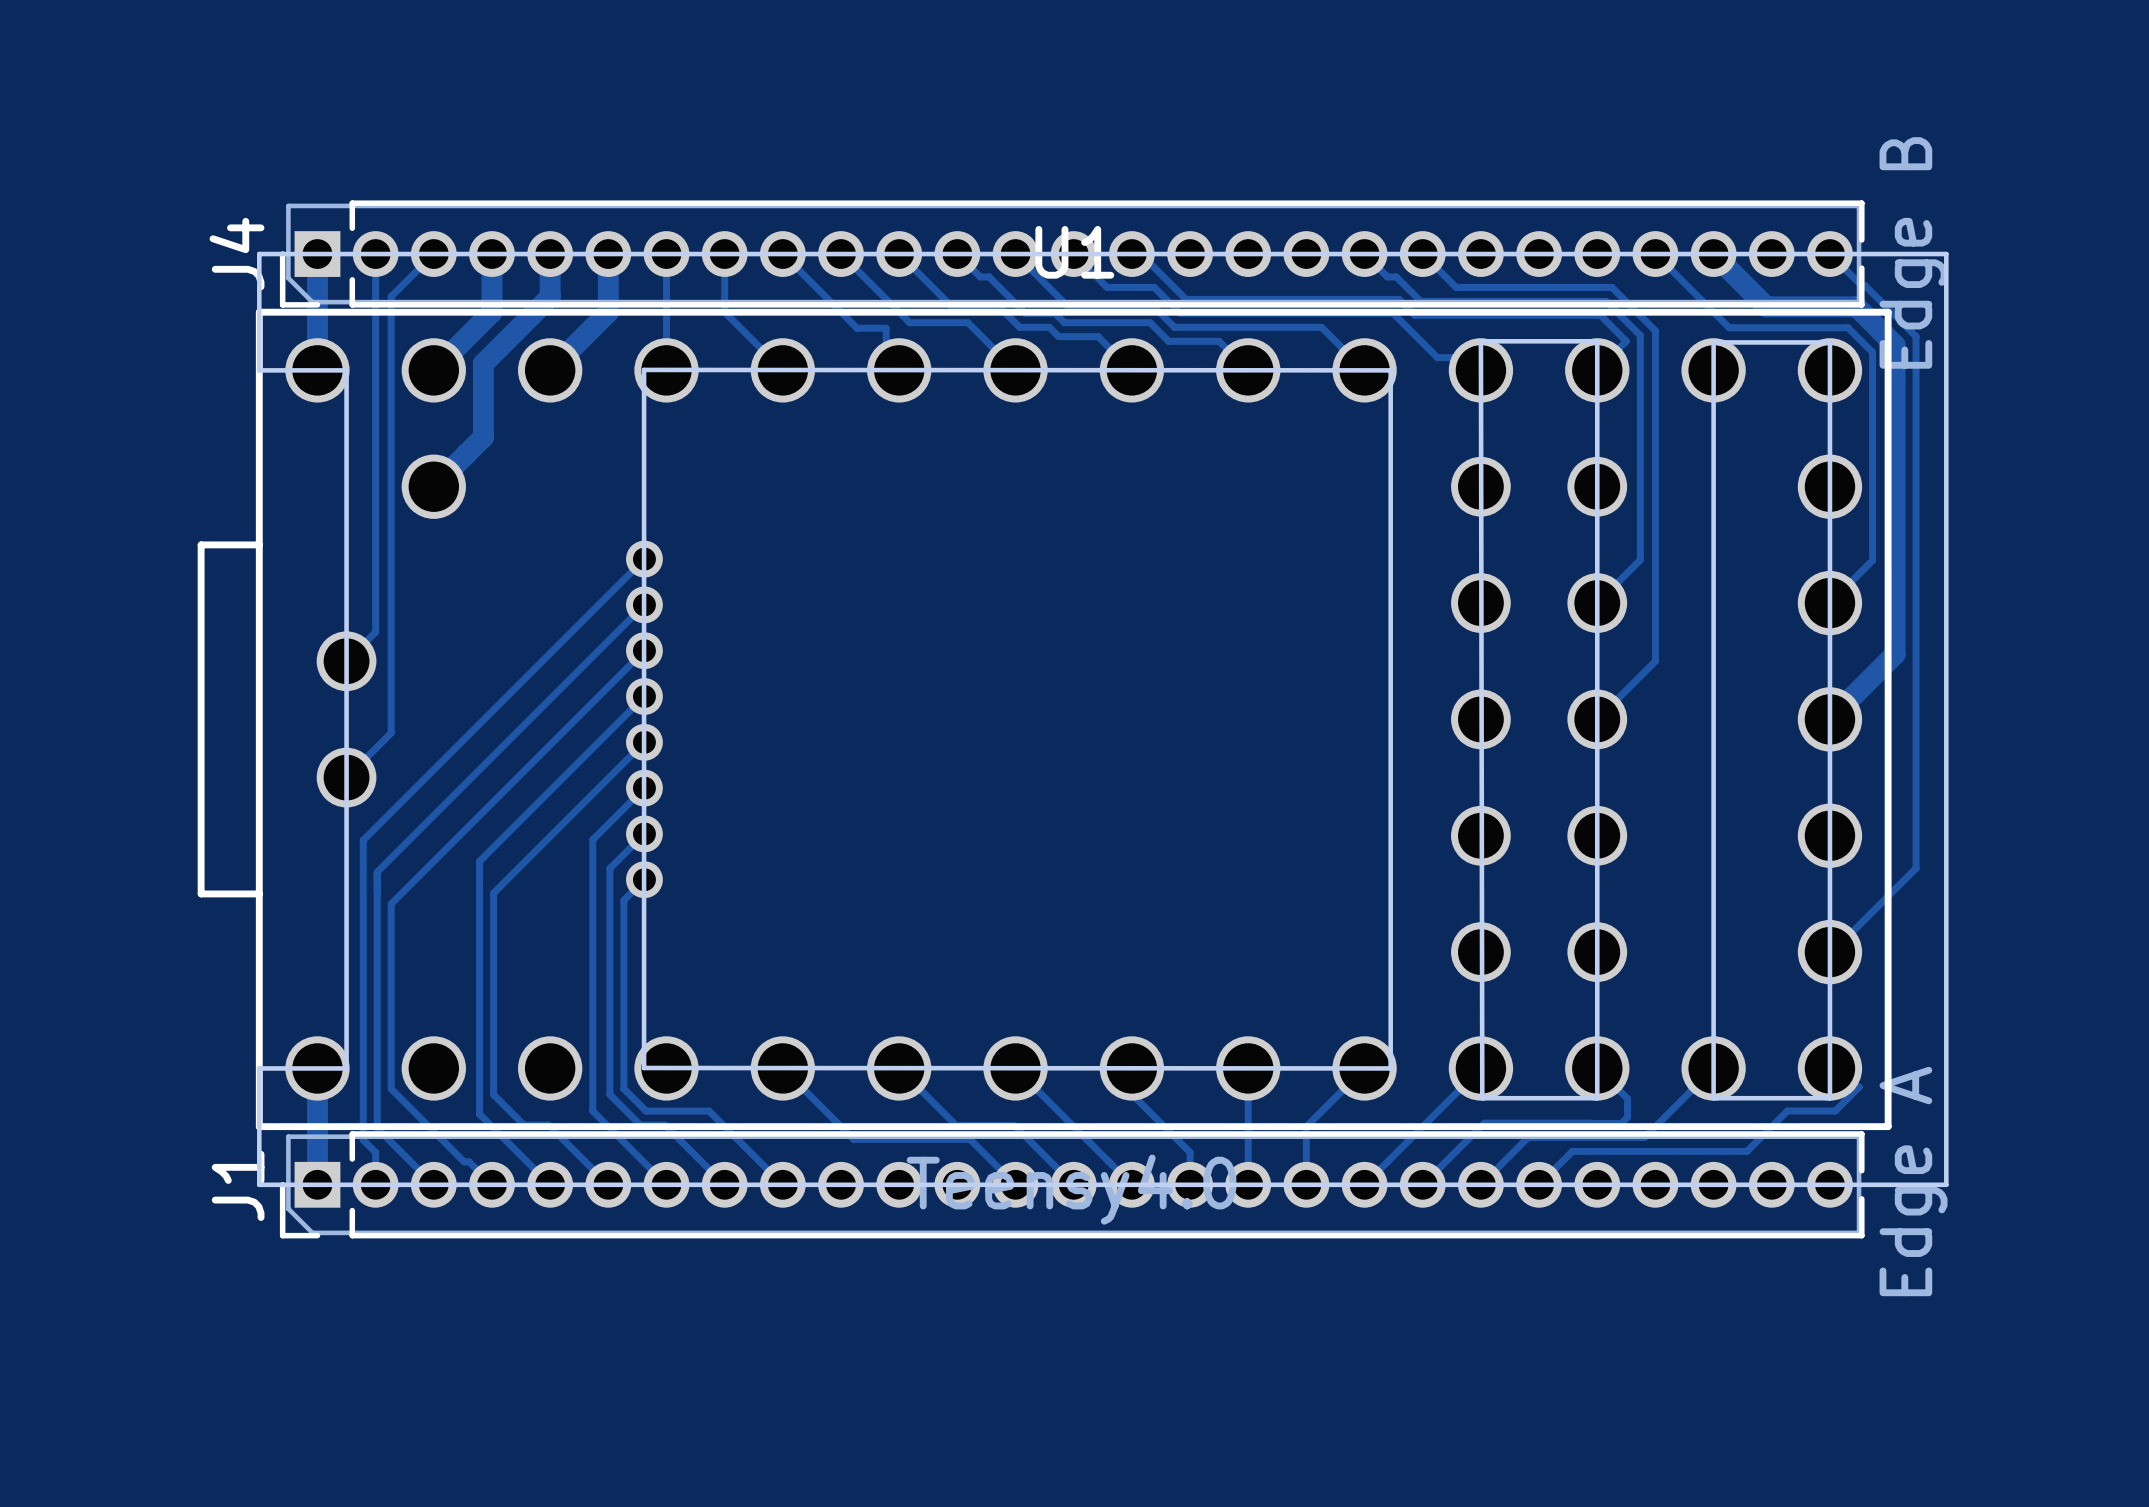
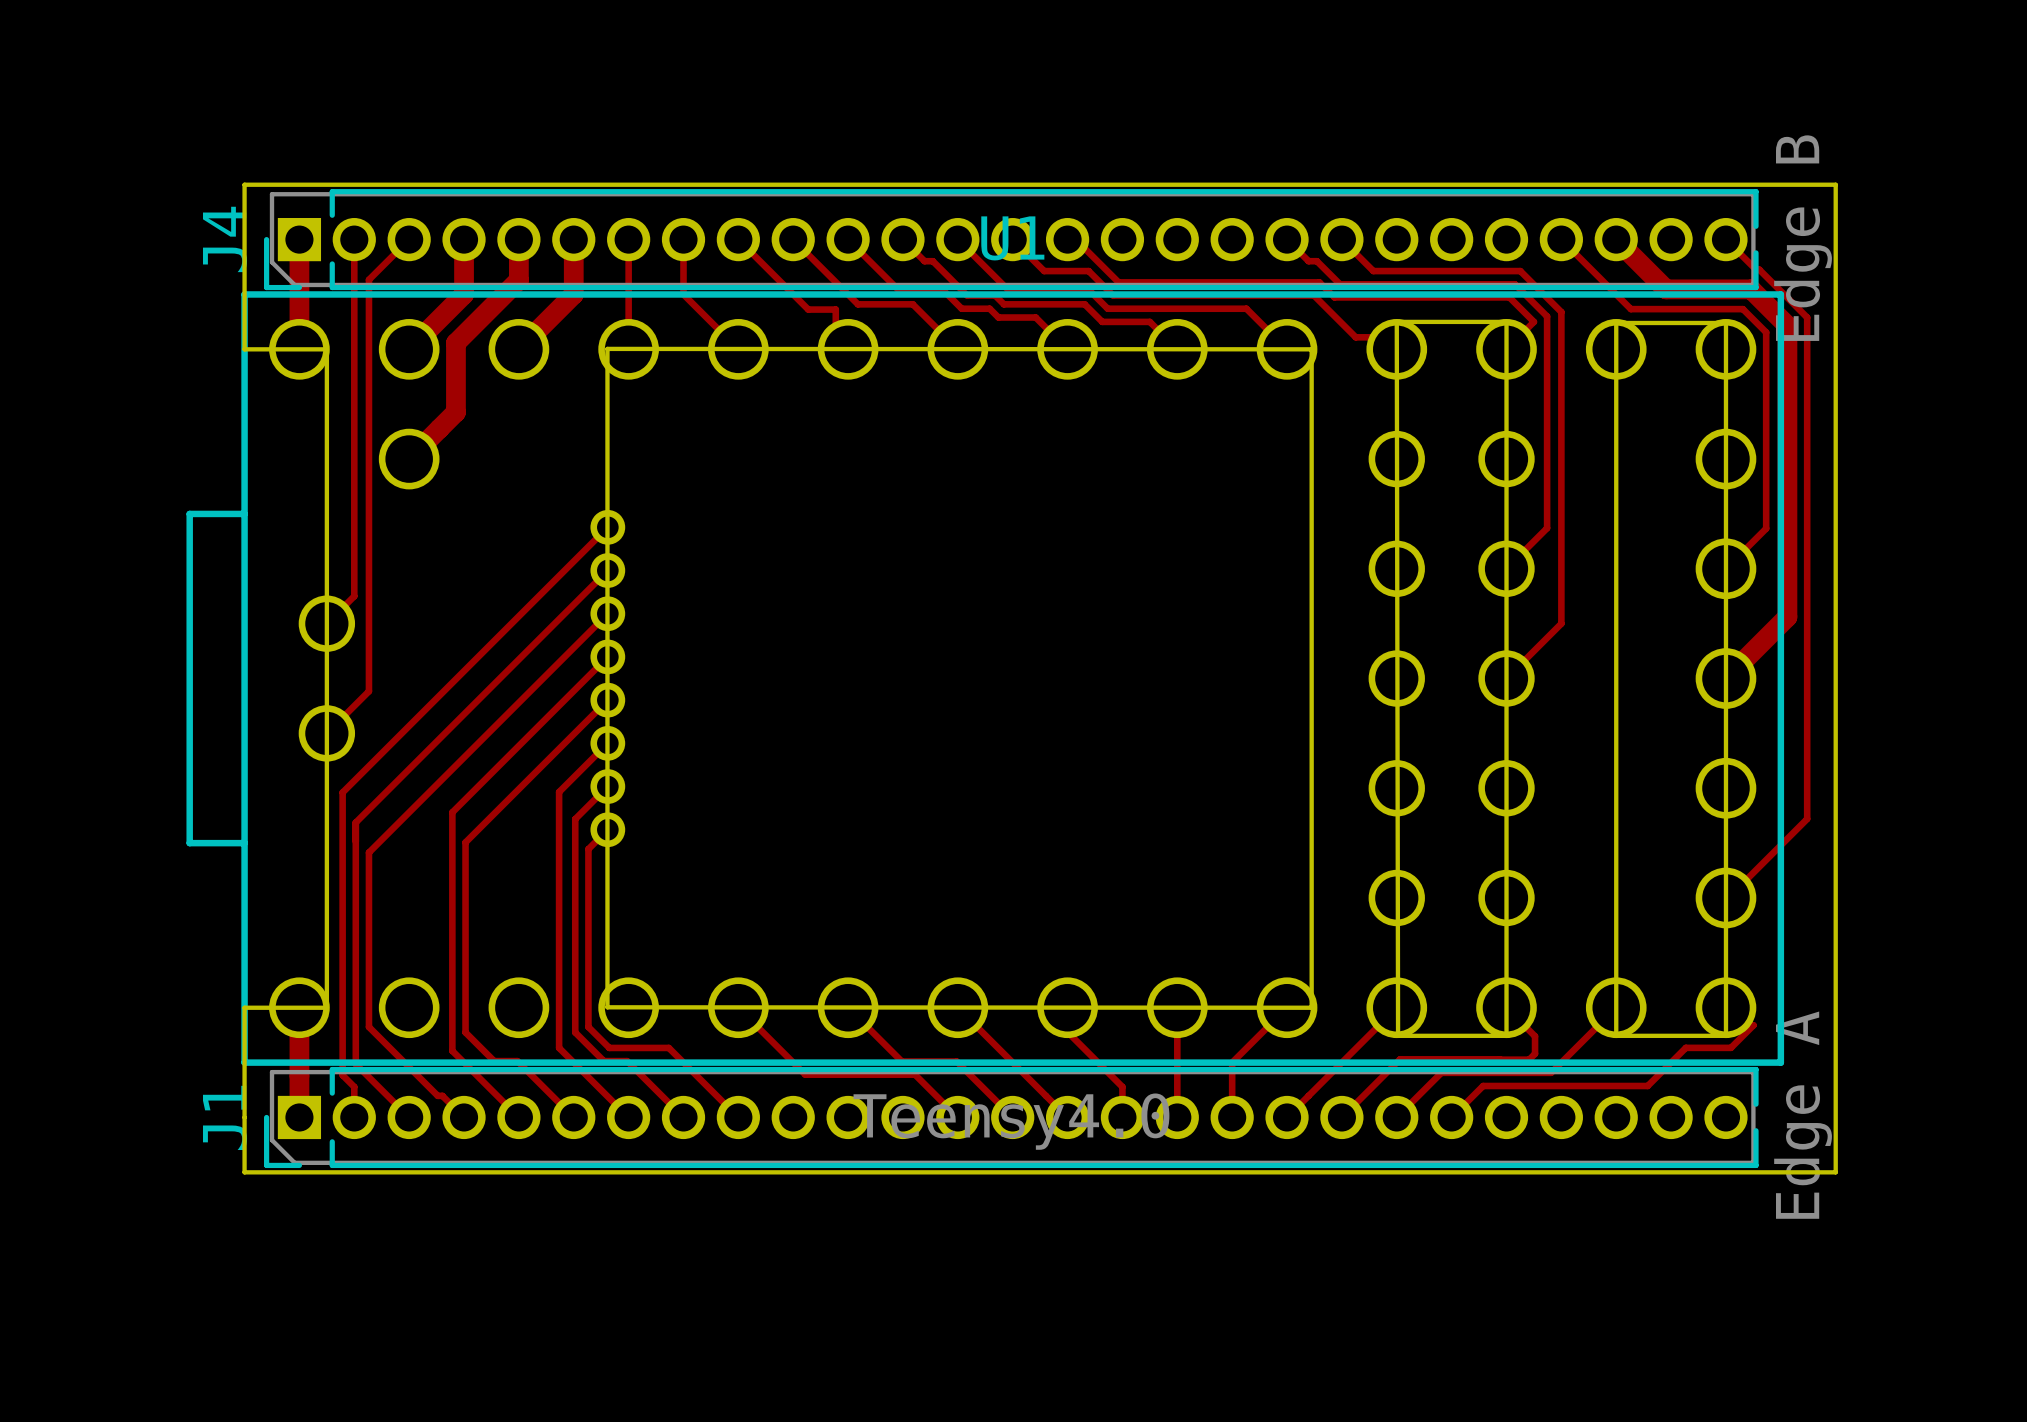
board edge: (259, 254) (1946, 254) -> (244, 239) (244, 184) (1835, 184) (1835, 239)
board edge: (259, 1184) (1946, 1184) -> (244, 1117) (244, 1172) (1835, 1172) (1835, 1117)

